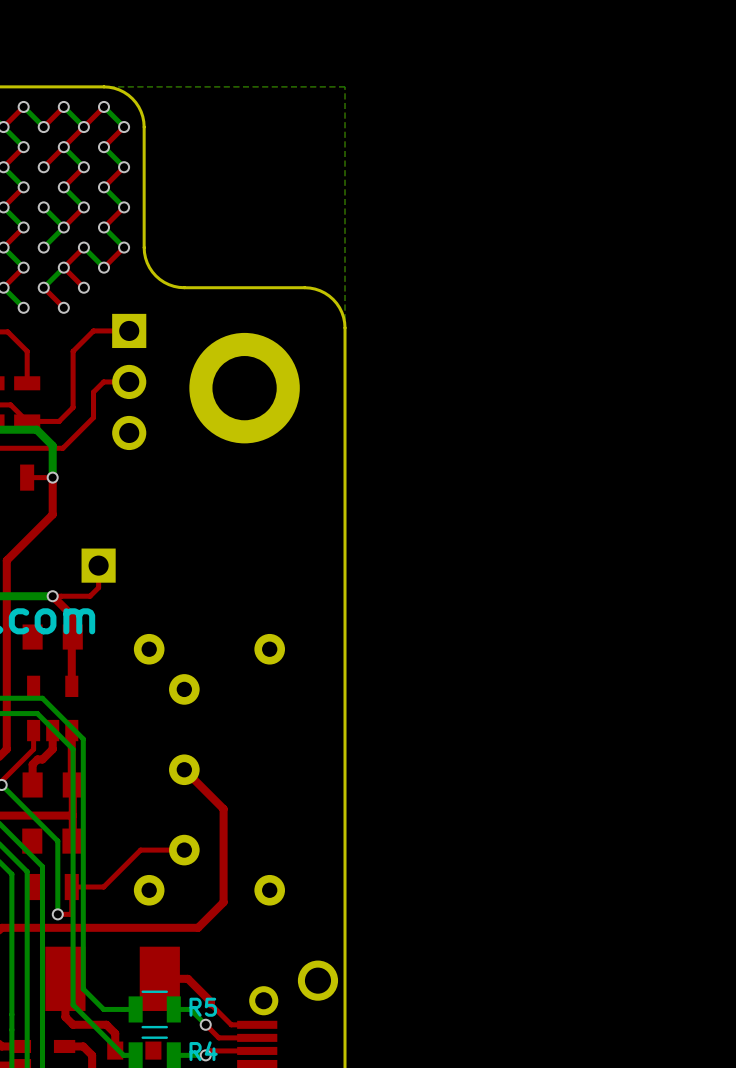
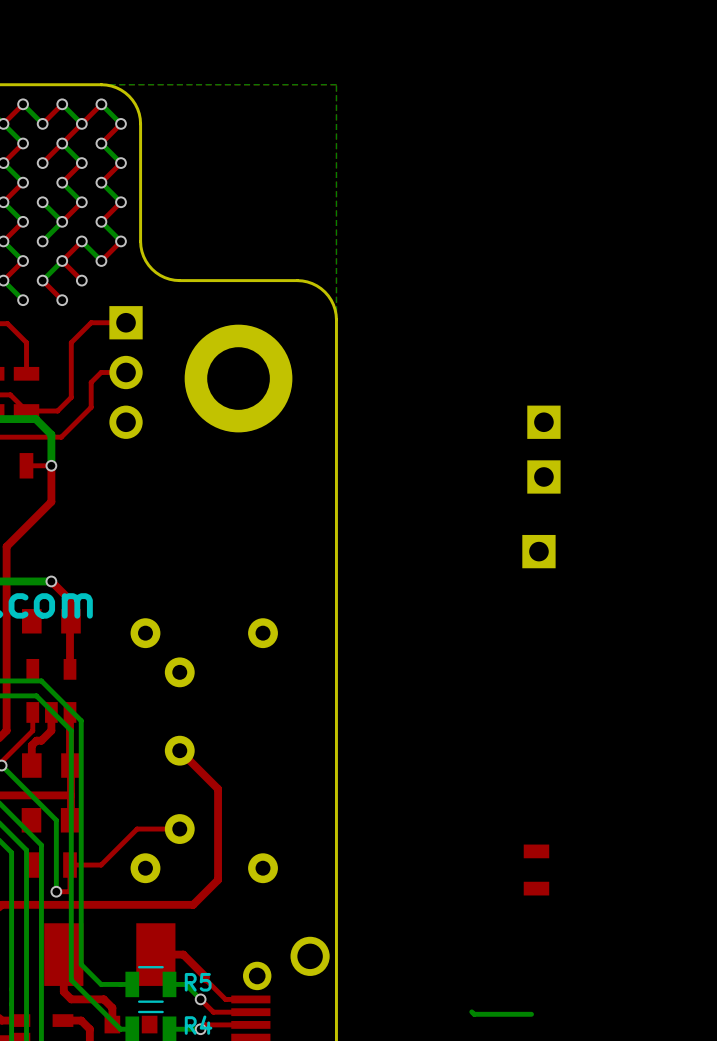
part: none -> (543, 422)
part: none -> (543, 476)
top track: (98, 565) (98, 587) (90, 596) (52, 596) -> none
part: (98, 565) -> none
part: none -> (538, 551)
part: none -> (536, 870)
bottom track: none -> (471, 1011) (474, 1014) (531, 1014)

